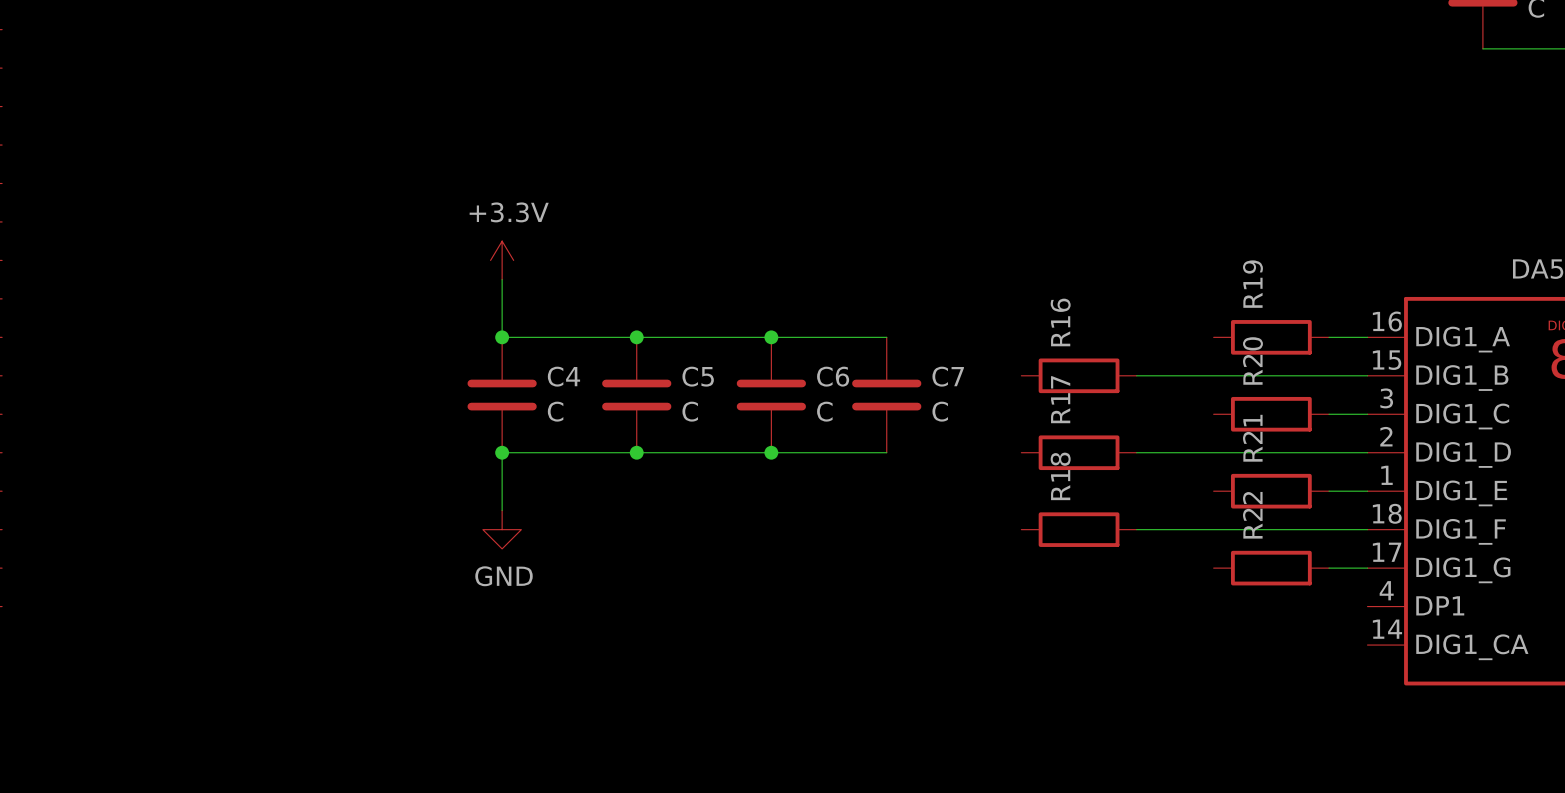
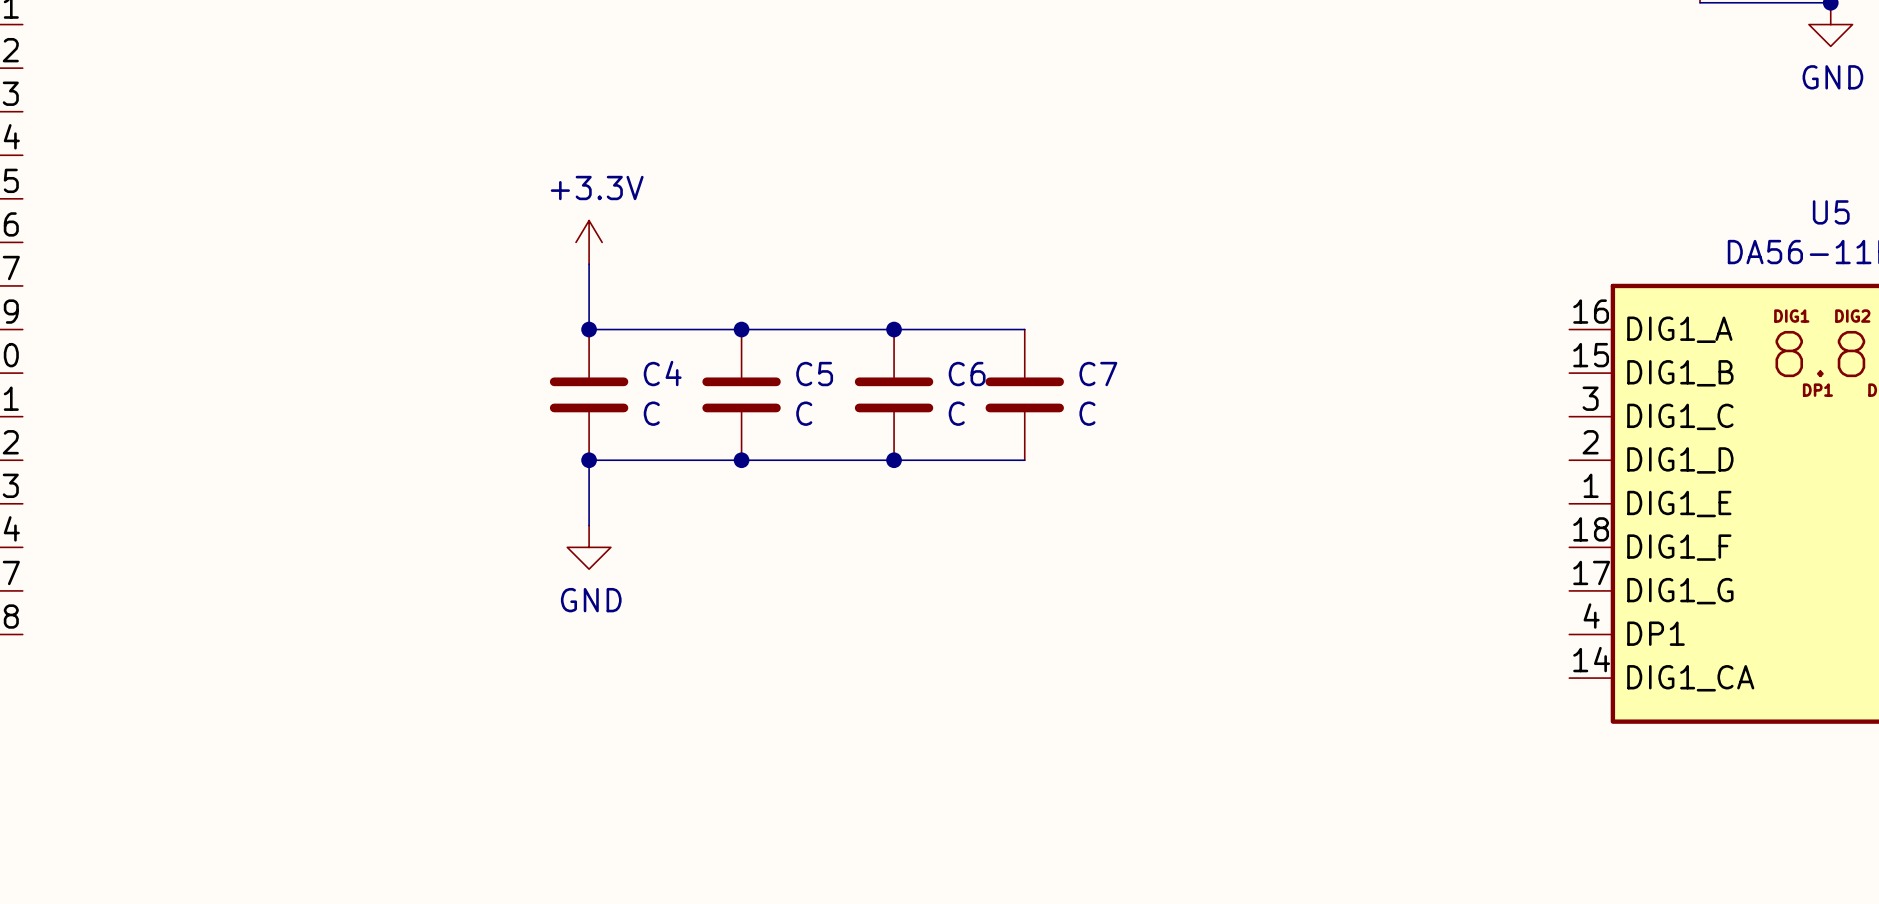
R19: (1271, 337) -> none
wire: (1329, 337) (1367, 337) -> none
R16: (1079, 375) -> none
wire: (1136, 375) (1367, 375) -> none
R20: (1271, 414) -> none
wire: (1329, 414) (1367, 414) -> none
R17: (1079, 452) -> none
wire: (1136, 452) (1367, 452) -> none
R21: (1271, 491) -> none
wire: (1329, 491) (1367, 491) -> none
R18: (1079, 529) -> none
wire: (1136, 529) (1367, 529) -> none
R22: (1271, 568) -> none
wire: (1329, 568) (1367, 568) -> none

